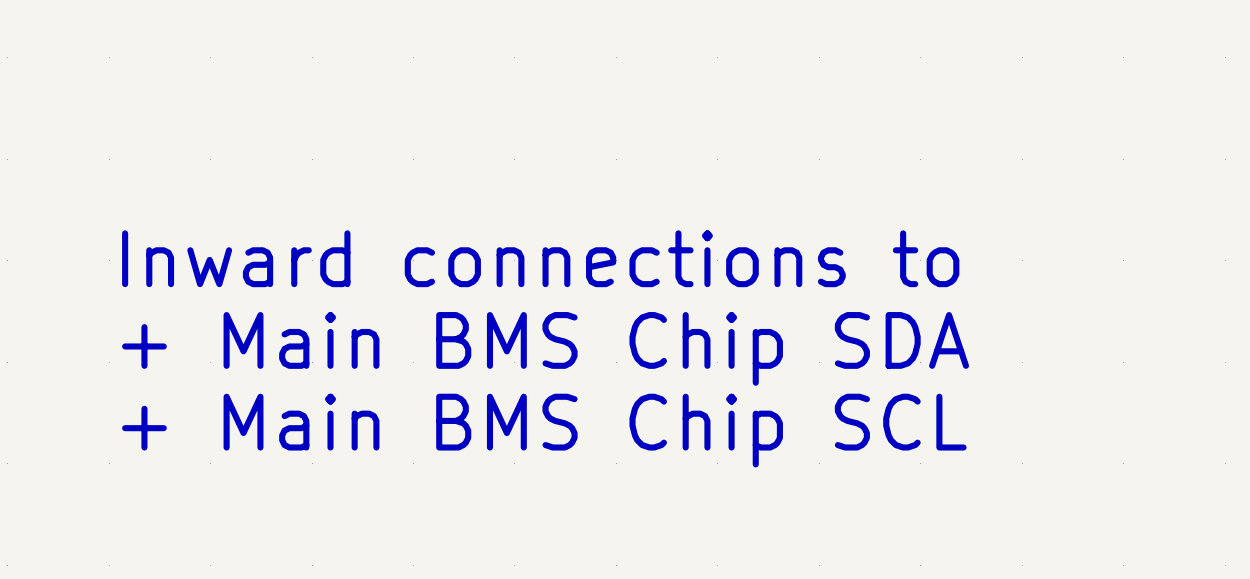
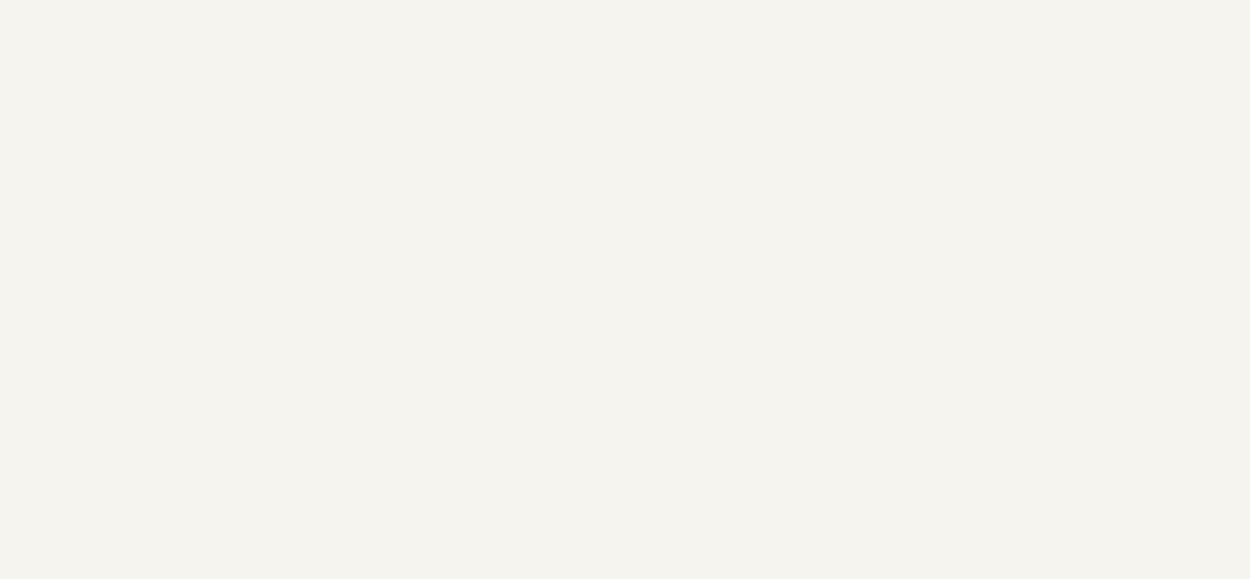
text: Inward connections to (540, 258) -> none
text: + Main BMS Chip SDA (545, 348) -> none
text: + Main BMS Chip SCL (544, 430) -> none

